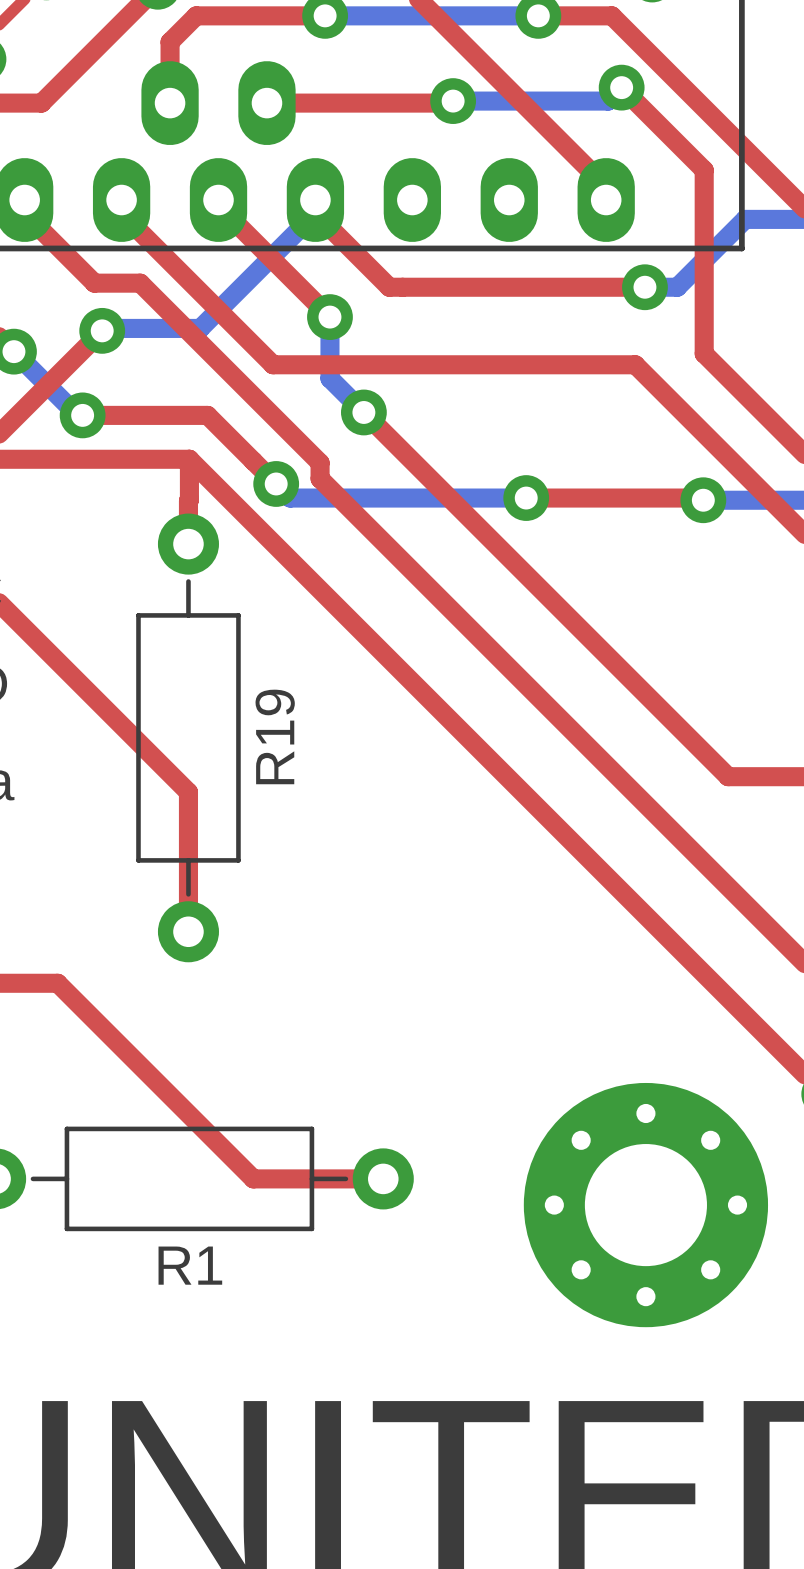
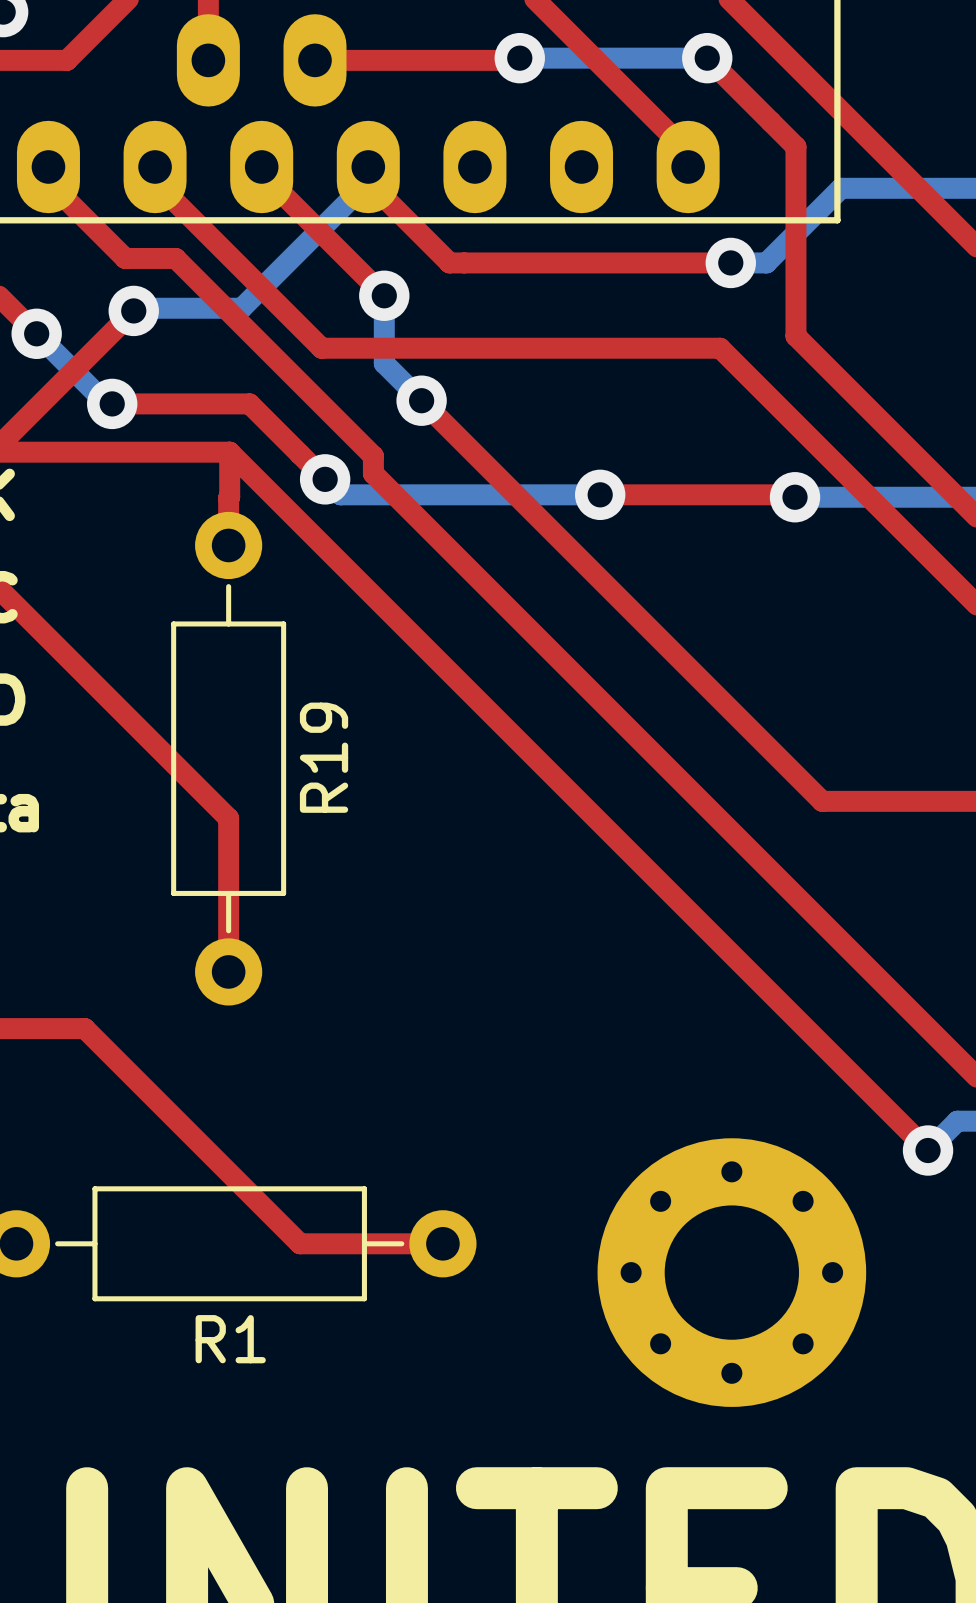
top track: (621, 87) (704, 170) (704, 181) -> (707, 58) (795, 146)
via position: (621, 87) -> (707, 58)

